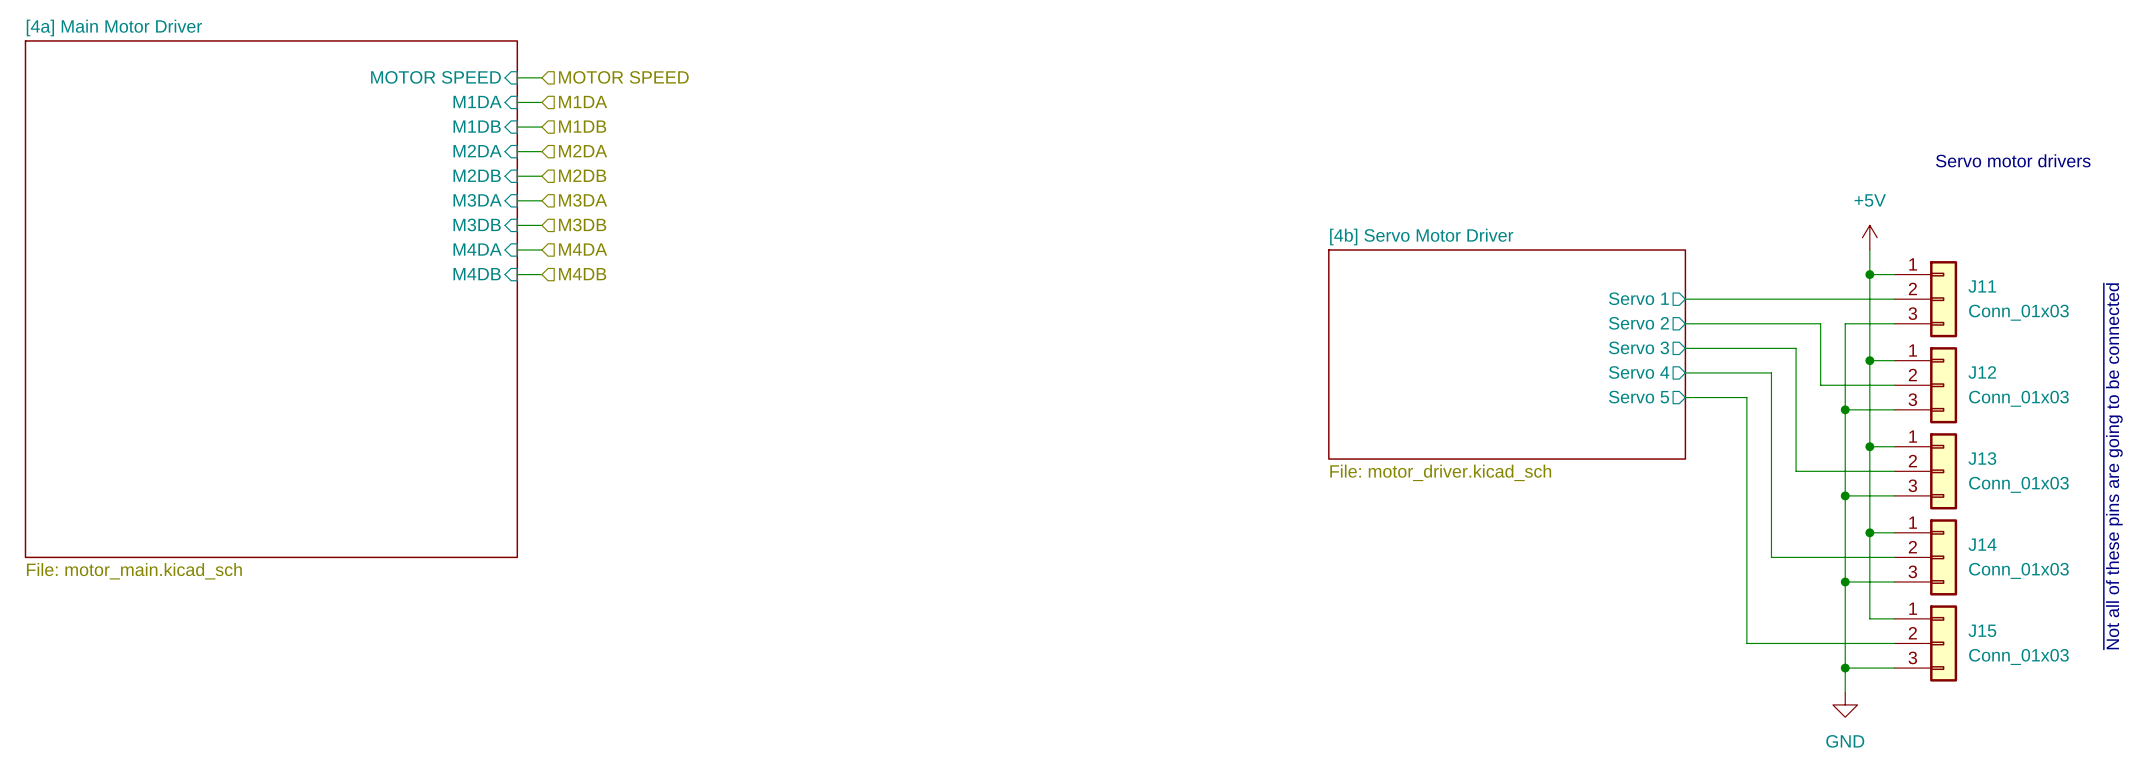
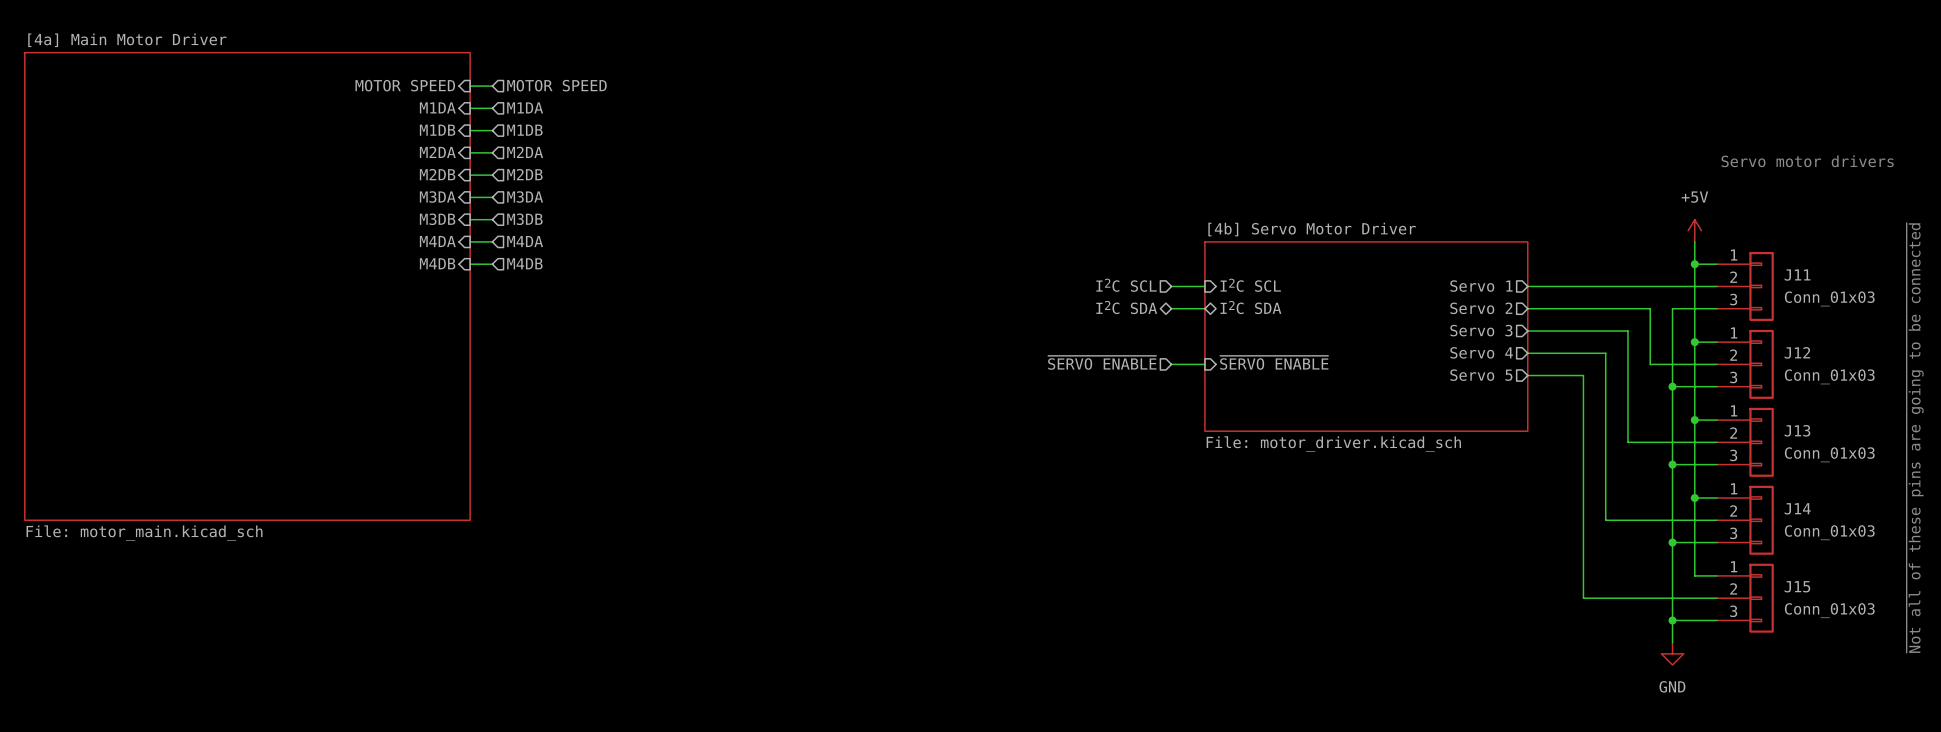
hierarchical label: none -> I2C SCL (1126, 285)
sheet pin: none -> I2C SCL (1250, 285)
wire: none -> (1171, 286) (1204, 286)
hierarchical label: none -> I2C SDA (1126, 307)
sheet pin: none -> I2C SDA (1250, 307)
wire: none -> (1171, 308) (1204, 308)
hierarchical label: none -> ~{SERVO ENABLE} (1102, 362)
sheet pin: none -> ~{SERVO ENABLE} (1274, 362)
wire: none -> (1171, 364) (1204, 364)

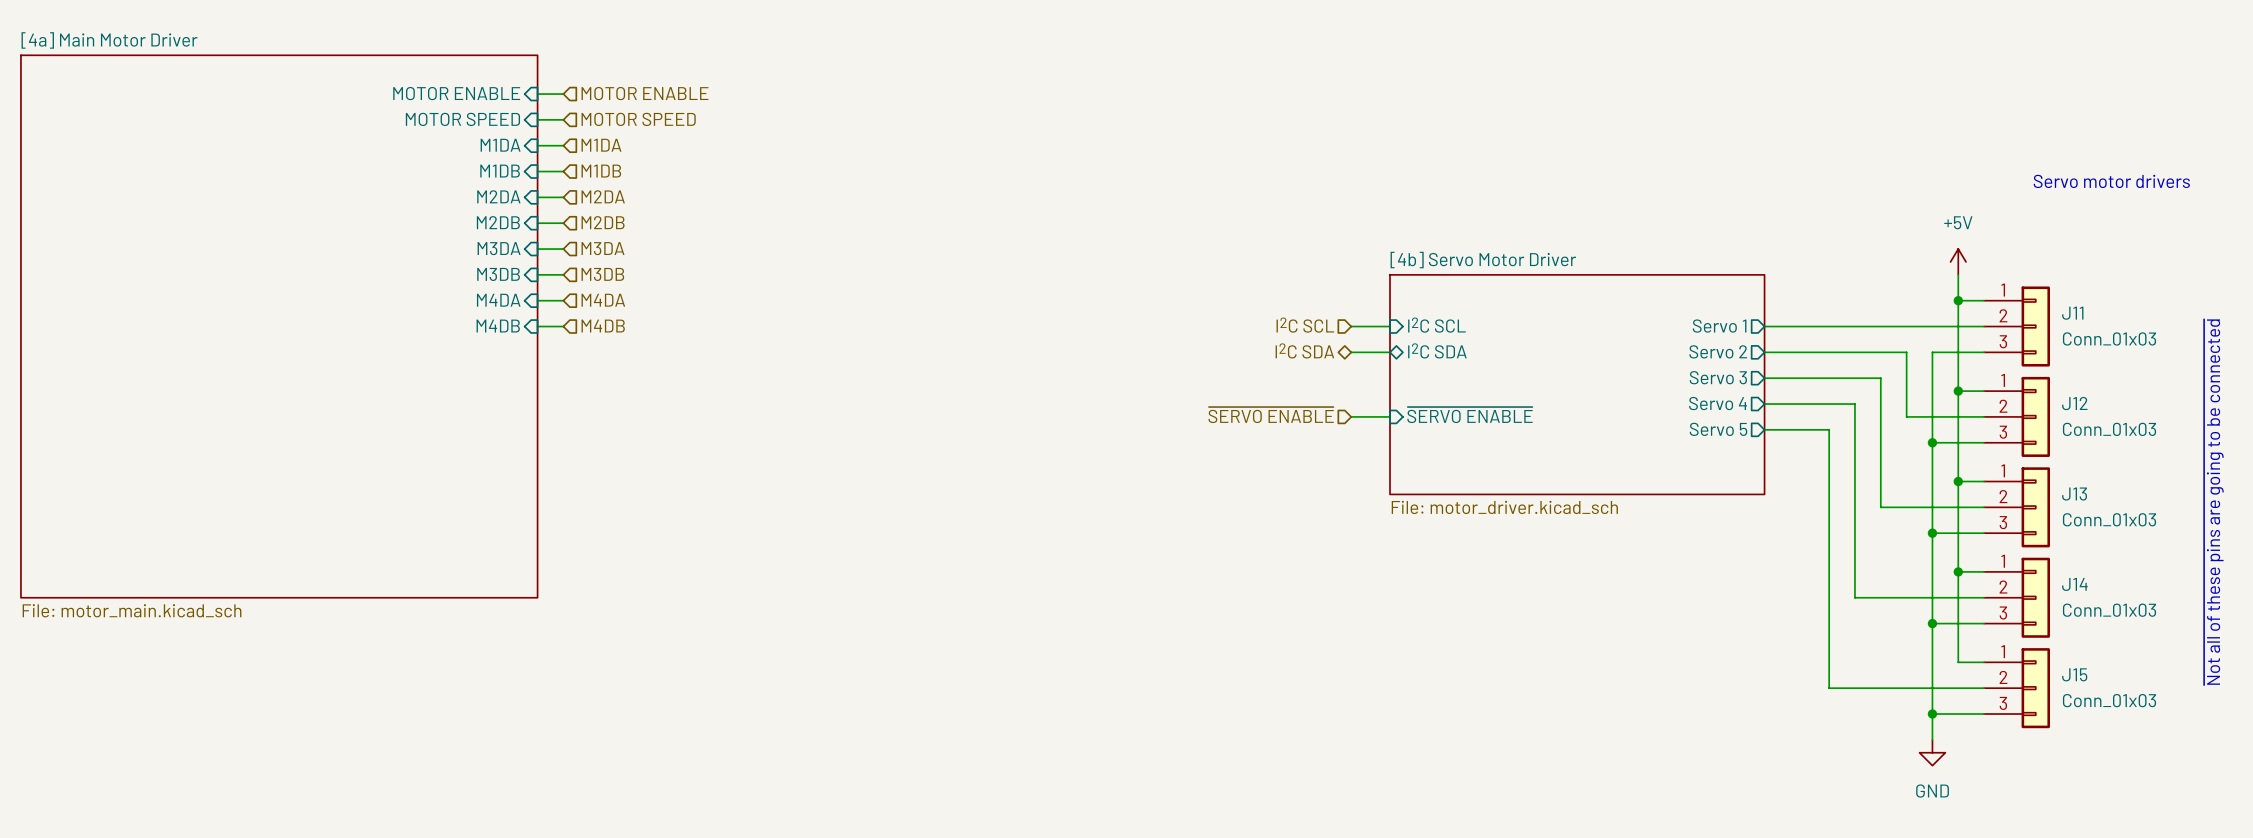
sheet pin: MOTOR SPEED (405, 85) -> MOTOR ENABLE (456, 93)
hierarchical label: MOTOR SPEED (556, 85) -> MOTOR ENABLE (644, 93)
sheet pin: M1DA (437, 107) -> MOTOR SPEED (462, 119)
hierarchical label: M1DA (525, 107) -> MOTOR SPEED (638, 119)
sheet pin: M1DB (437, 130) -> M1DA (500, 145)
hierarchical label: M1DB (524, 130) -> M1DA (601, 145)
sheet pin: M2DA (437, 152) -> M1DB (500, 171)
hierarchical label: M2DA (525, 152) -> M1DB (601, 171)
sheet pin: M2DB (437, 174) -> M2DA (498, 196)
hierarchical label: M2DB (524, 174) -> M2DA (603, 196)
sheet pin: M3DA (437, 197) -> M2DB (498, 222)
hierarchical label: M3DA (525, 197) -> M2DB (603, 222)
sheet pin: M3DB (437, 219) -> M3DA (499, 248)
hierarchical label: M3DB (524, 219) -> M3DA (603, 248)
sheet pin: M4DA (437, 241) -> M3DB (498, 274)
hierarchical label: M4DA (525, 241) -> M3DB (602, 274)
sheet pin: M4DB (437, 263) -> M4DA (498, 300)
hierarchical label: M4DB (524, 263) -> M4DA (603, 300)
sheet pin: none -> M4DB (498, 326)
wire: none -> (537, 326) (563, 326)
hierarchical label: none -> M4DB (603, 326)

